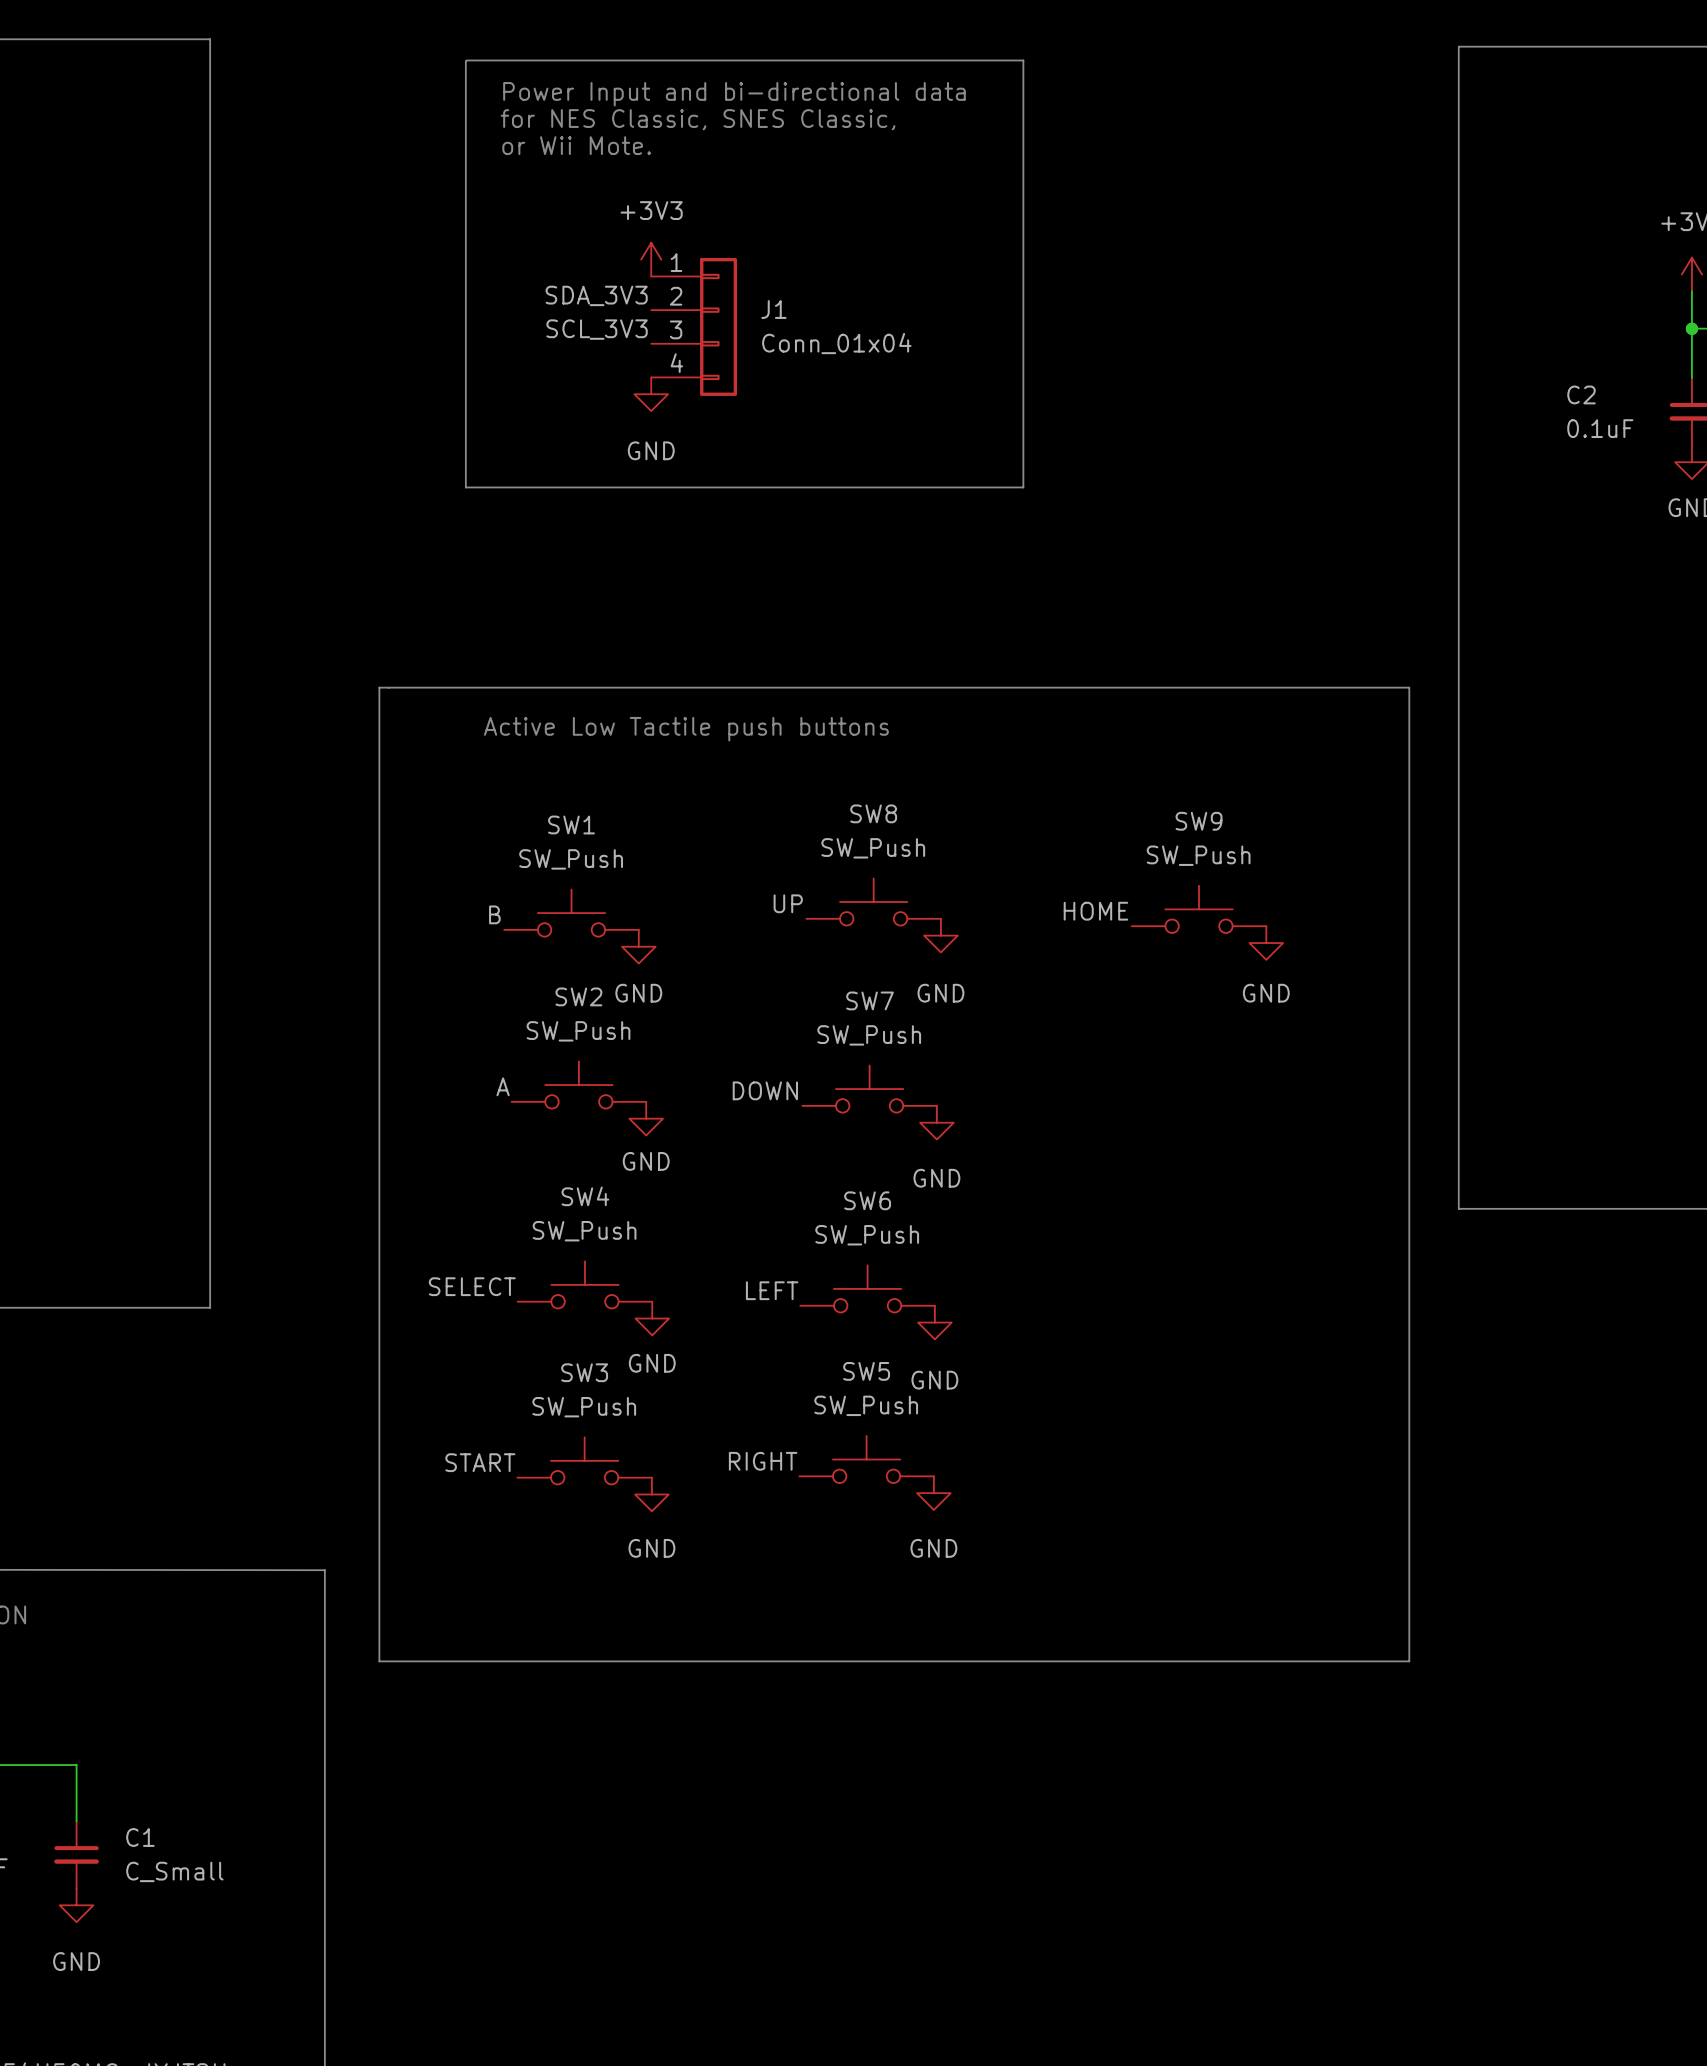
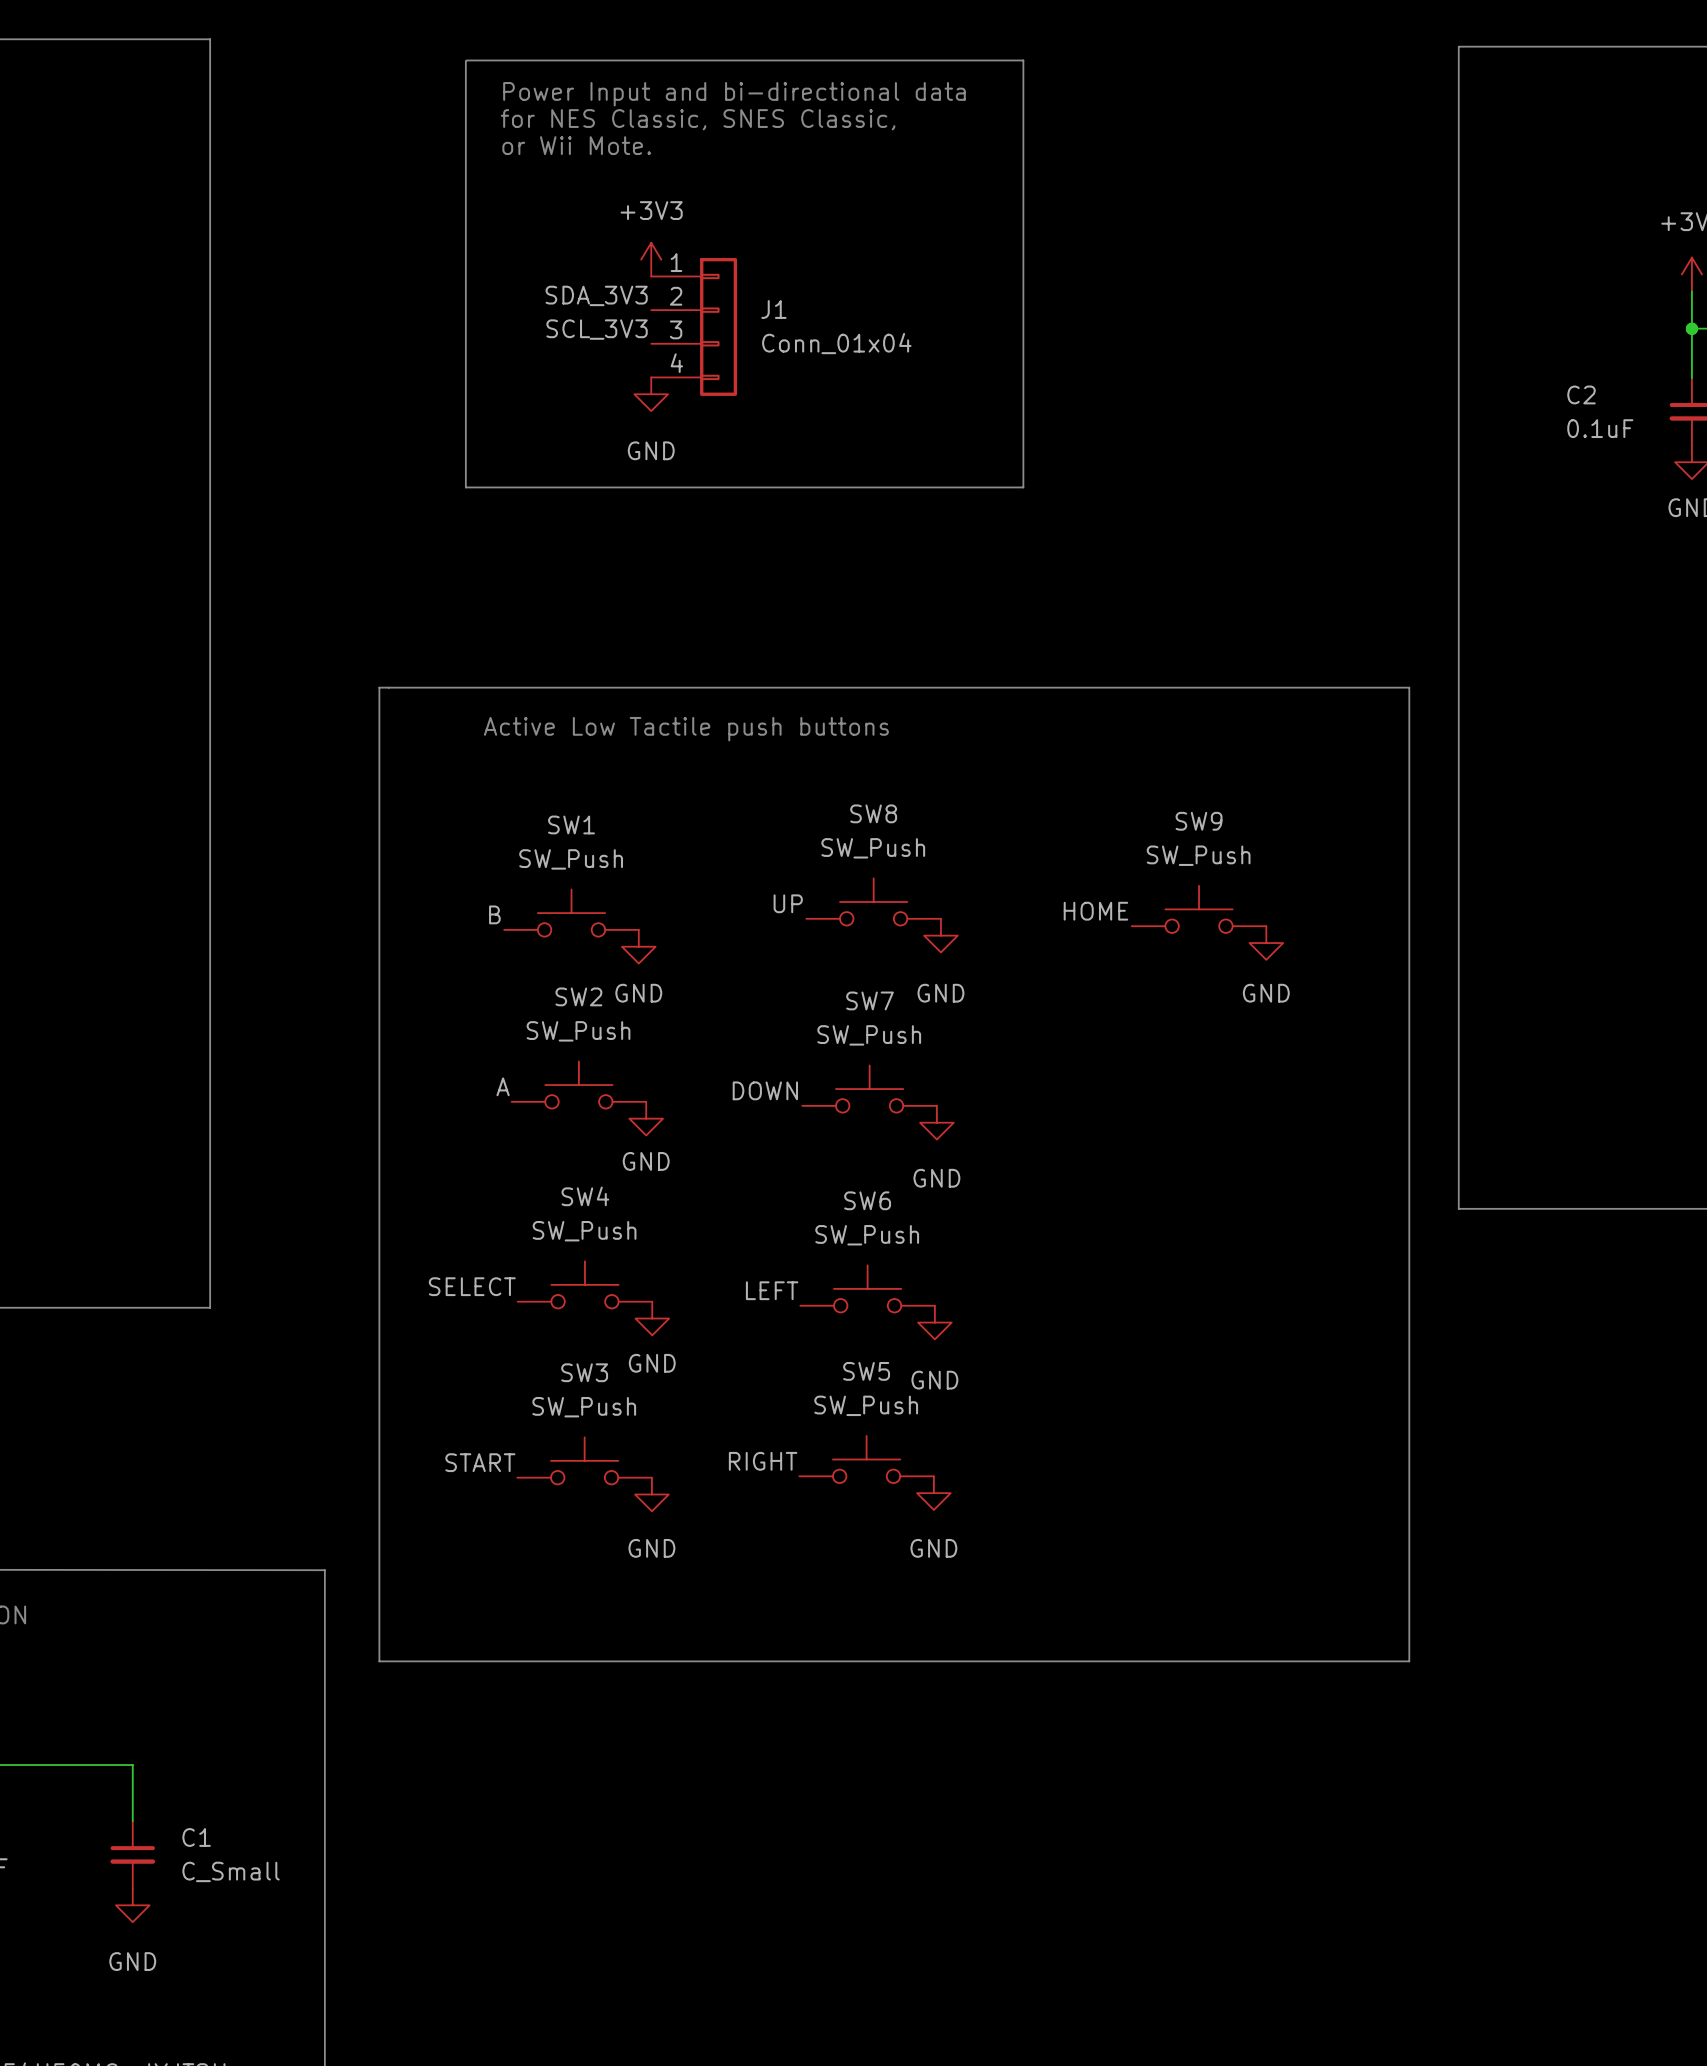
wire: (76, 1765) (76, 1821) -> (76, 1765) (132, 1765) (132, 1821)
C1 position: (76, 1854) -> (132, 1854)
power symbol position: GND (76, 1905) -> GND (132, 1905)

